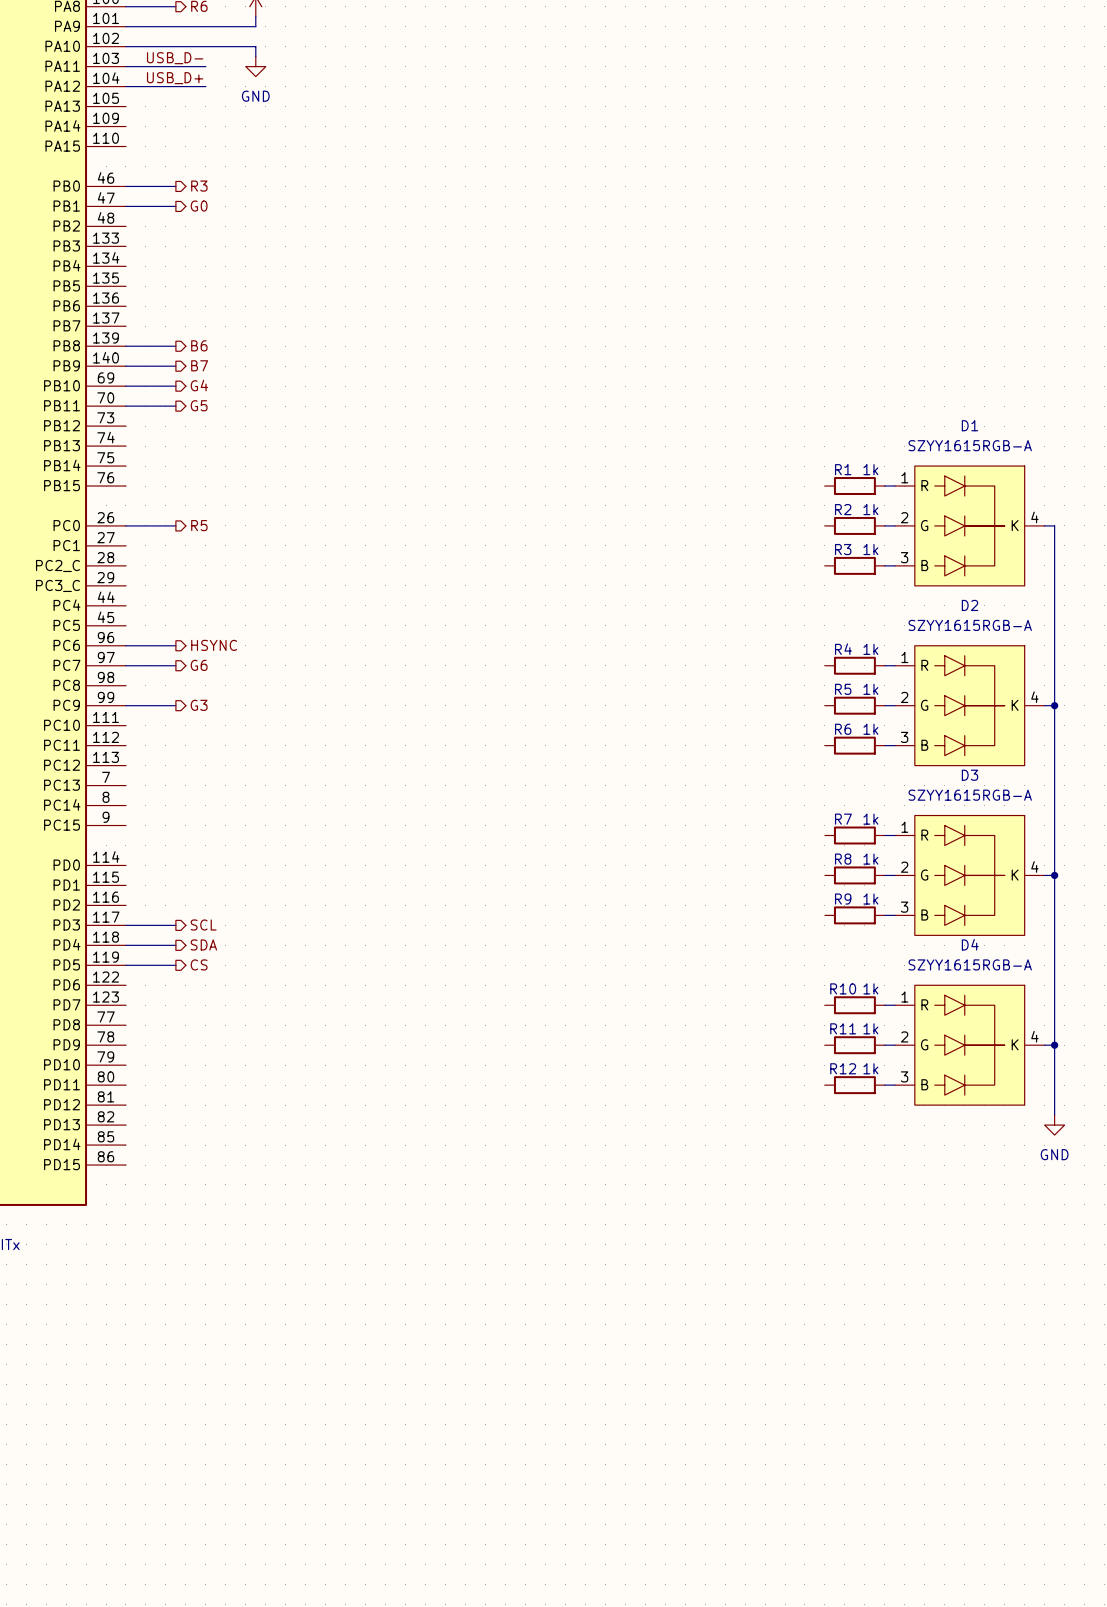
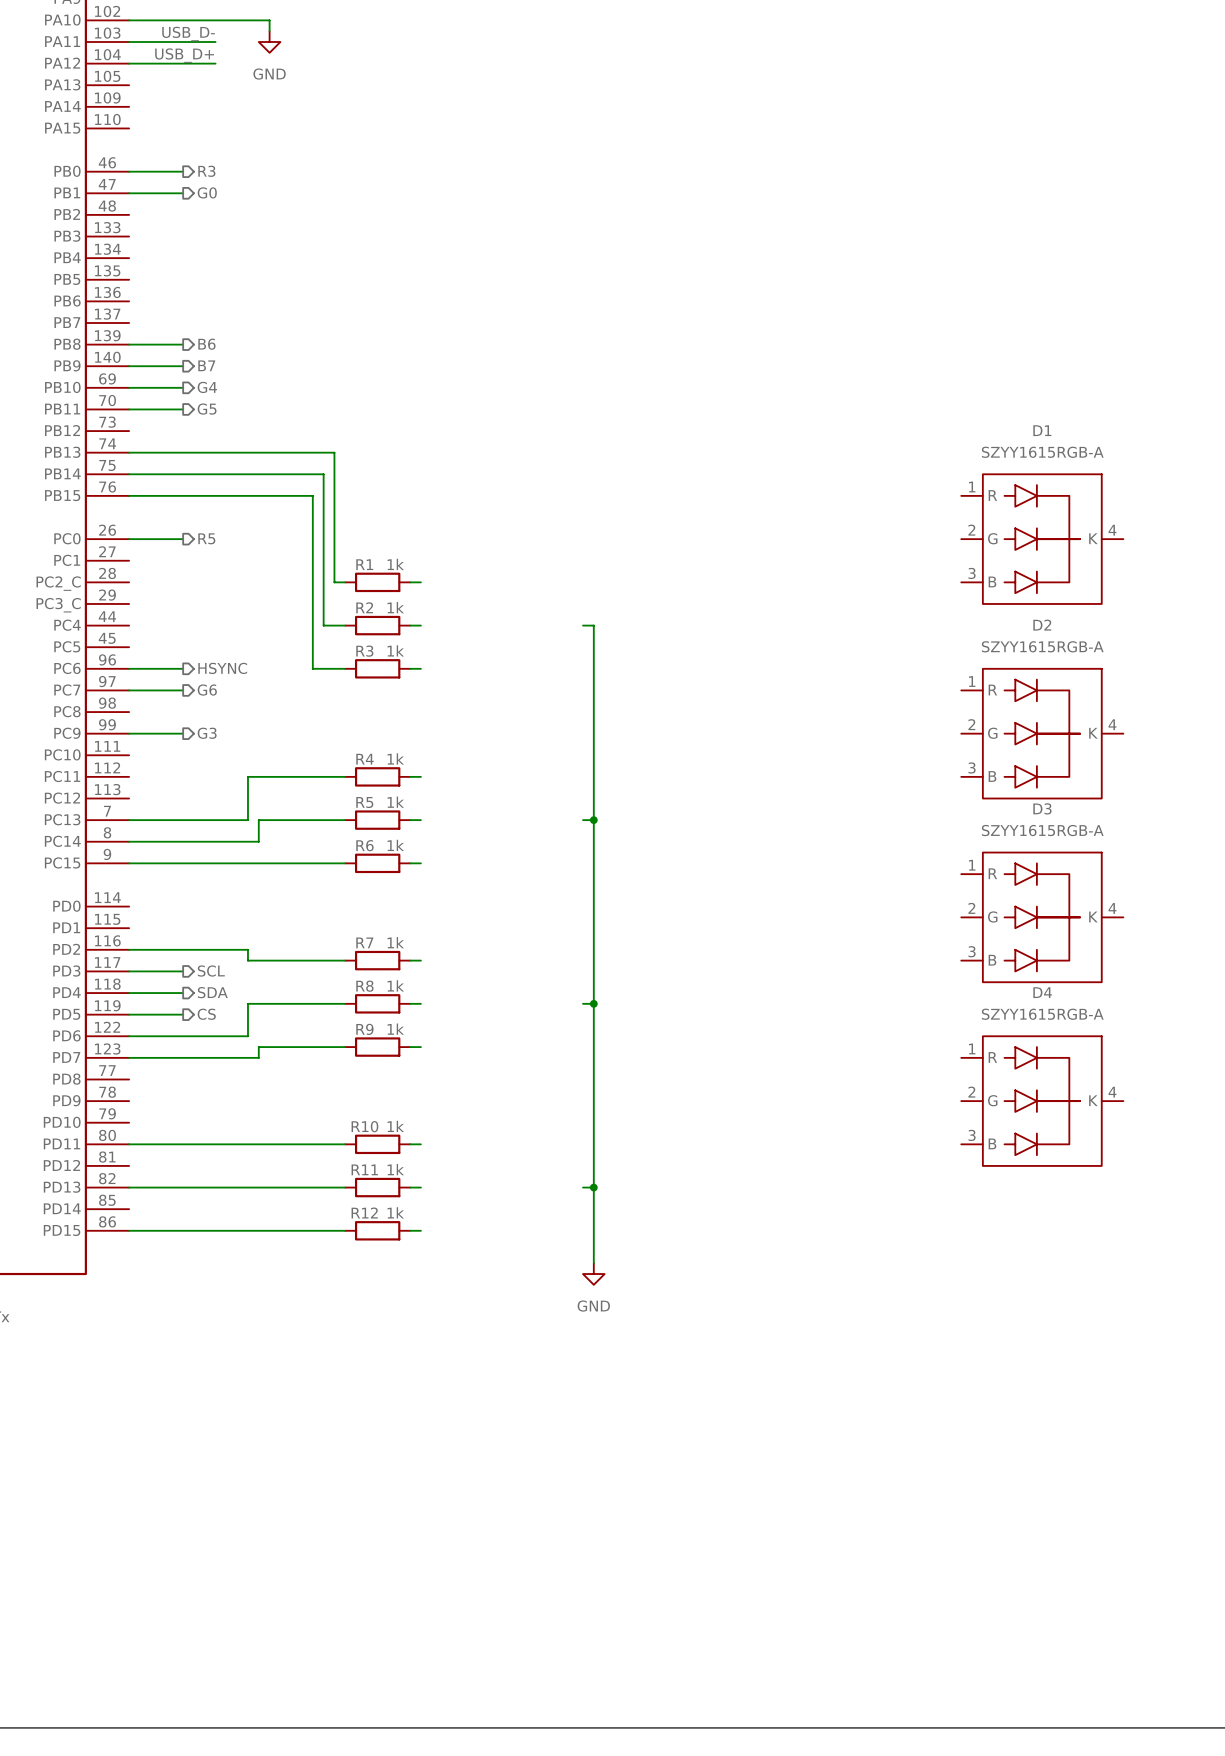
wire: none -> (129, 452) (334, 452) (334, 582) (345, 582)
wire: none -> (129, 474) (323, 474) (323, 625) (345, 625)
wire: none -> (129, 495) (312, 495) (312, 668) (345, 668)
R1 position: (854, 486) -> (377, 582)
wire: (884, 486) (894, 486) -> none
R2 position: (854, 525) -> (377, 625)
wire: (884, 525) (894, 525) -> none
wire: (1044, 525) (1054, 525) (1054, 1115) -> none
wire: none -> (410, 582) (420, 582)
R3 position: (854, 565) -> (377, 668)
wire: (884, 565) (894, 565) -> none
wire: none -> (410, 625) (420, 625)
wire: none -> (583, 625) (593, 625) (593, 1263)
wire: none -> (410, 668) (420, 668)
R4 position: (854, 665) -> (377, 776)
wire: (884, 665) (894, 665) -> none
R5 position: (854, 705) -> (377, 820)
wire: (884, 705) (894, 705) -> none
wire: (1044, 705) (1054, 705) -> none
junction: (1054, 705) -> none
wire: none -> (345, 776) (247, 776) (247, 820) (129, 820)
wire: none -> (410, 776) (420, 776)
R6 position: (854, 745) -> (377, 863)
wire: (884, 745) (894, 745) -> none
wire: none -> (345, 820) (258, 820) (258, 841) (129, 841)
wire: none -> (410, 820) (420, 820)
wire: none -> (583, 820) (593, 820)
junction: none -> (593, 820)
wire: none -> (129, 863) (345, 863)
wire: none -> (410, 863) (420, 863)
R7 position: (854, 835) -> (377, 960)
wire: (884, 835) (894, 835) -> none
R8 position: (854, 875) -> (377, 1003)
wire: (884, 875) (894, 875) -> none
wire: (1044, 875) (1054, 875) -> none
junction: (1054, 875) -> none
wire: none -> (129, 949) (247, 949) (247, 960) (345, 960)
wire: none -> (410, 960) (420, 960)
R9 position: (854, 915) -> (377, 1047)
wire: (884, 915) (894, 915) -> none
wire: none -> (345, 1003) (247, 1003) (247, 1036) (129, 1036)
wire: none -> (410, 1003) (420, 1003)
wire: none -> (583, 1003) (593, 1003)
junction: none -> (593, 1003)
wire: none -> (345, 1047) (258, 1047) (258, 1057) (129, 1057)
wire: none -> (410, 1047) (420, 1047)
R10 position: (854, 1005) -> (377, 1144)
wire: (884, 1005) (894, 1005) -> none
R11 position: (854, 1045) -> (377, 1187)
wire: (884, 1045) (894, 1045) -> none
wire: (1044, 1045) (1054, 1045) -> none
junction: (1054, 1045) -> none
wire: none -> (129, 1144) (345, 1144)
wire: none -> (410, 1144) (420, 1144)
R12 position: (854, 1085) -> (377, 1230)
wire: (884, 1085) (894, 1085) -> none
wire: none -> (129, 1187) (345, 1187)
wire: none -> (410, 1187) (420, 1187)
wire: none -> (583, 1187) (593, 1187)
junction: none -> (593, 1187)
power symbol: GND (1054, 1125) -> none
wire: none -> (129, 1230) (345, 1230)
wire: none -> (410, 1230) (420, 1230)
power symbol: none -> GND (593, 1274)

